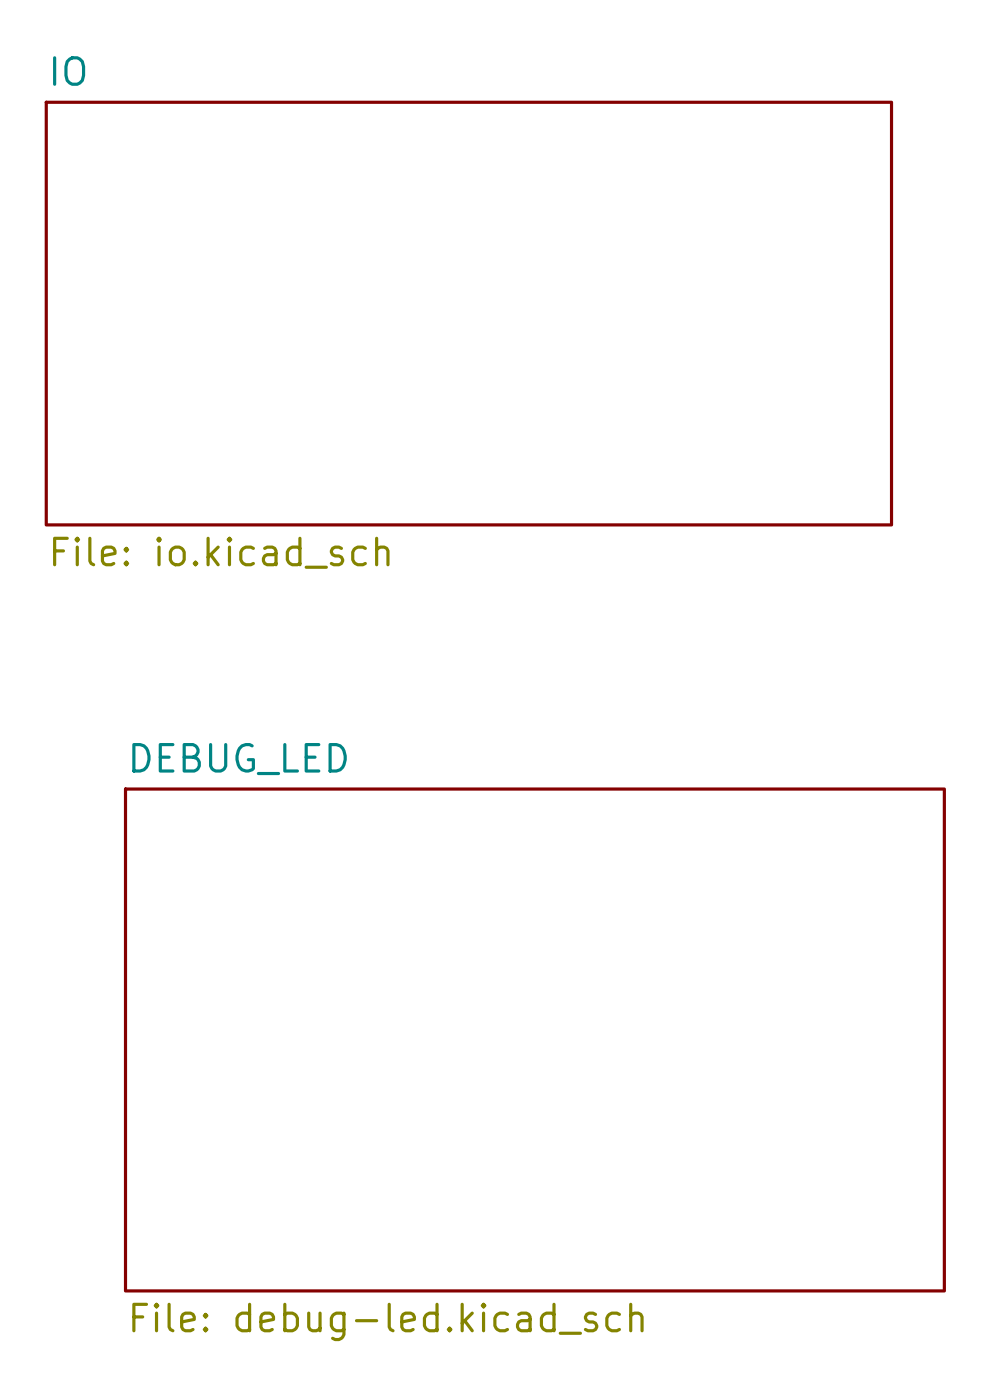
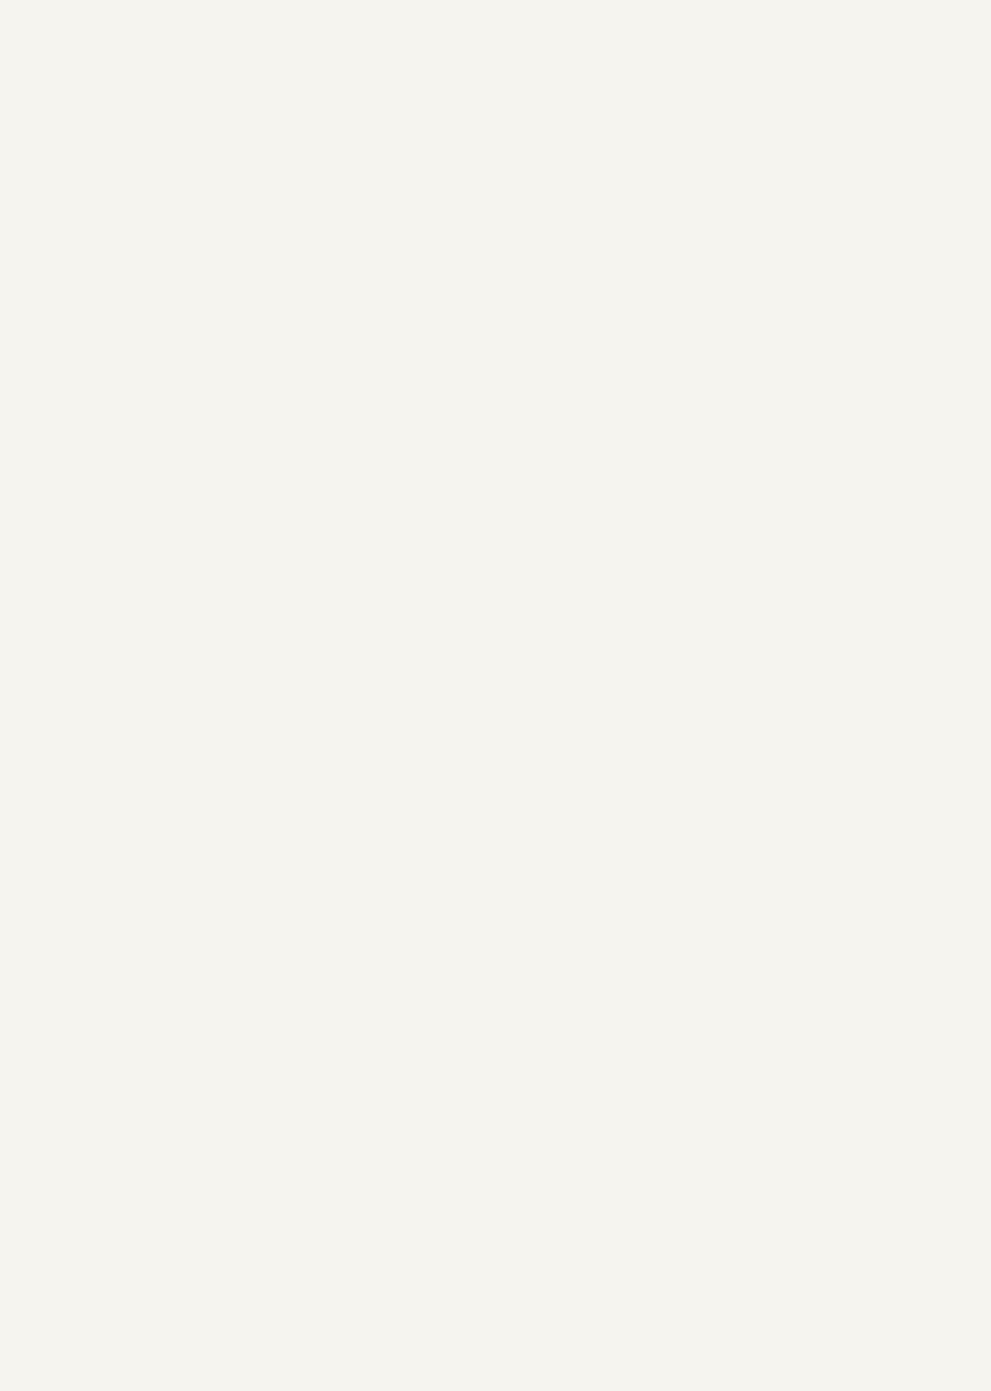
sheet IO: File: io.kicad_sch (468, 313) -> none
sheet DEBUG_LED: File: debug-led.kicad_sch (534, 1039) -> none

